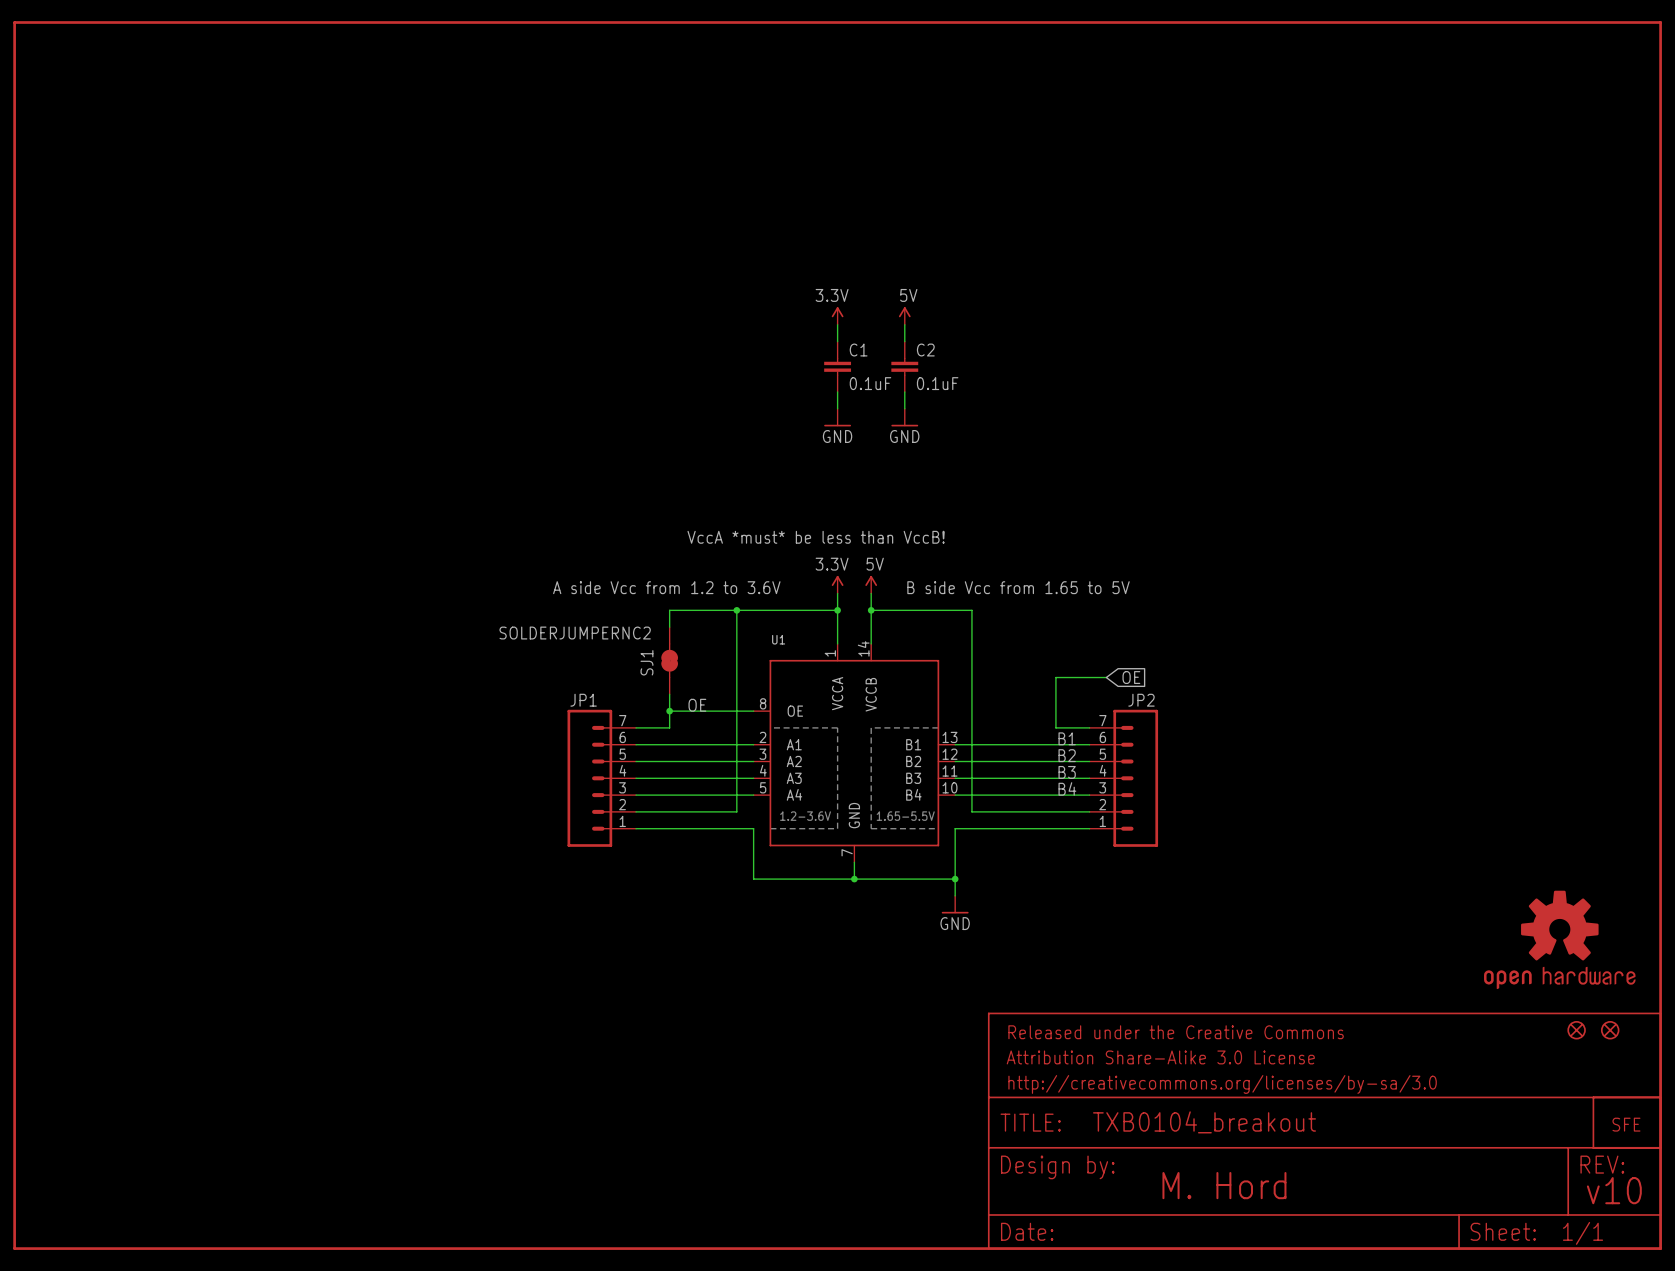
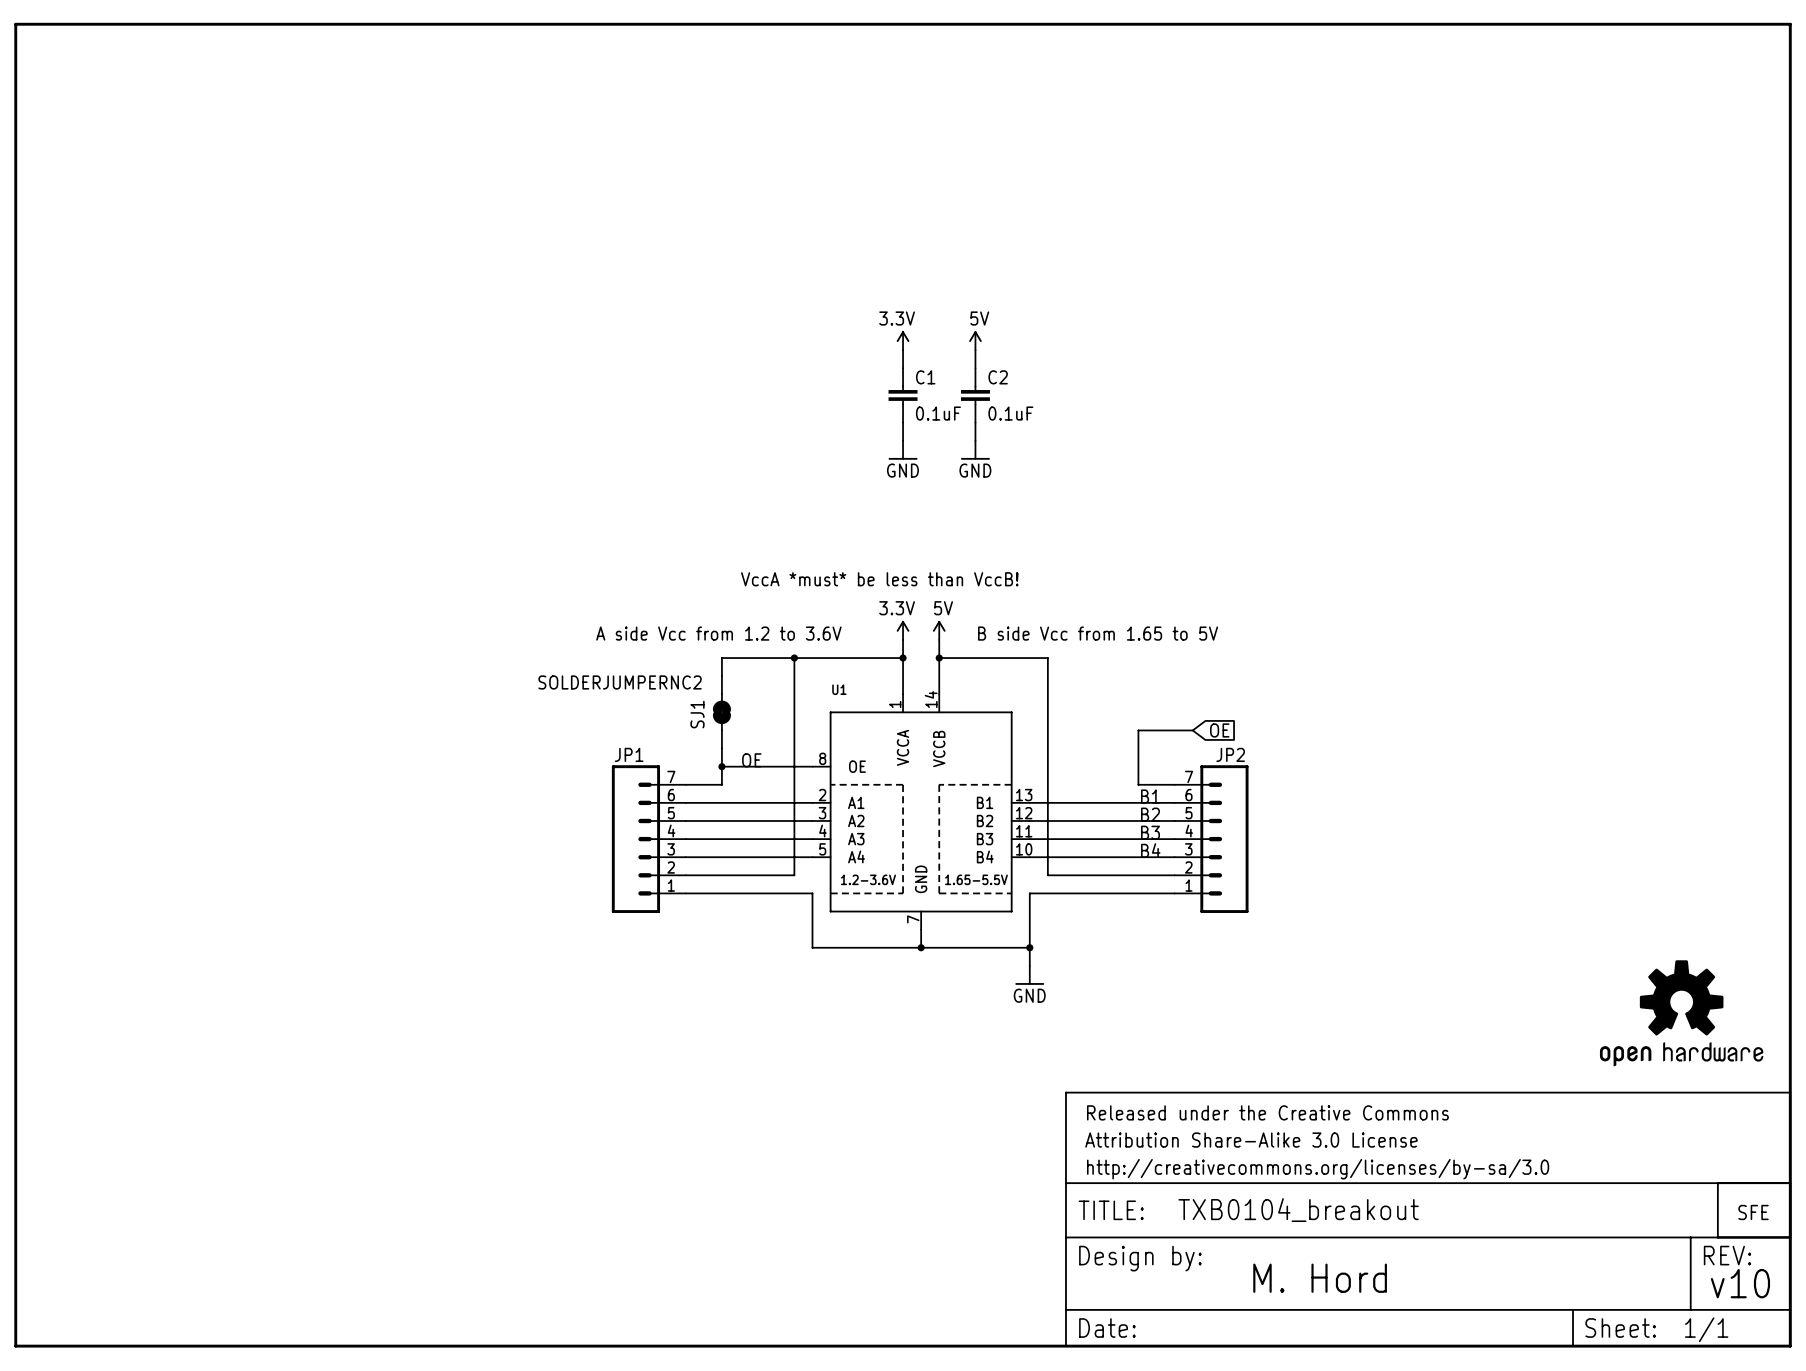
part: (1576, 1030) -> none
part: (1610, 1030) -> none

